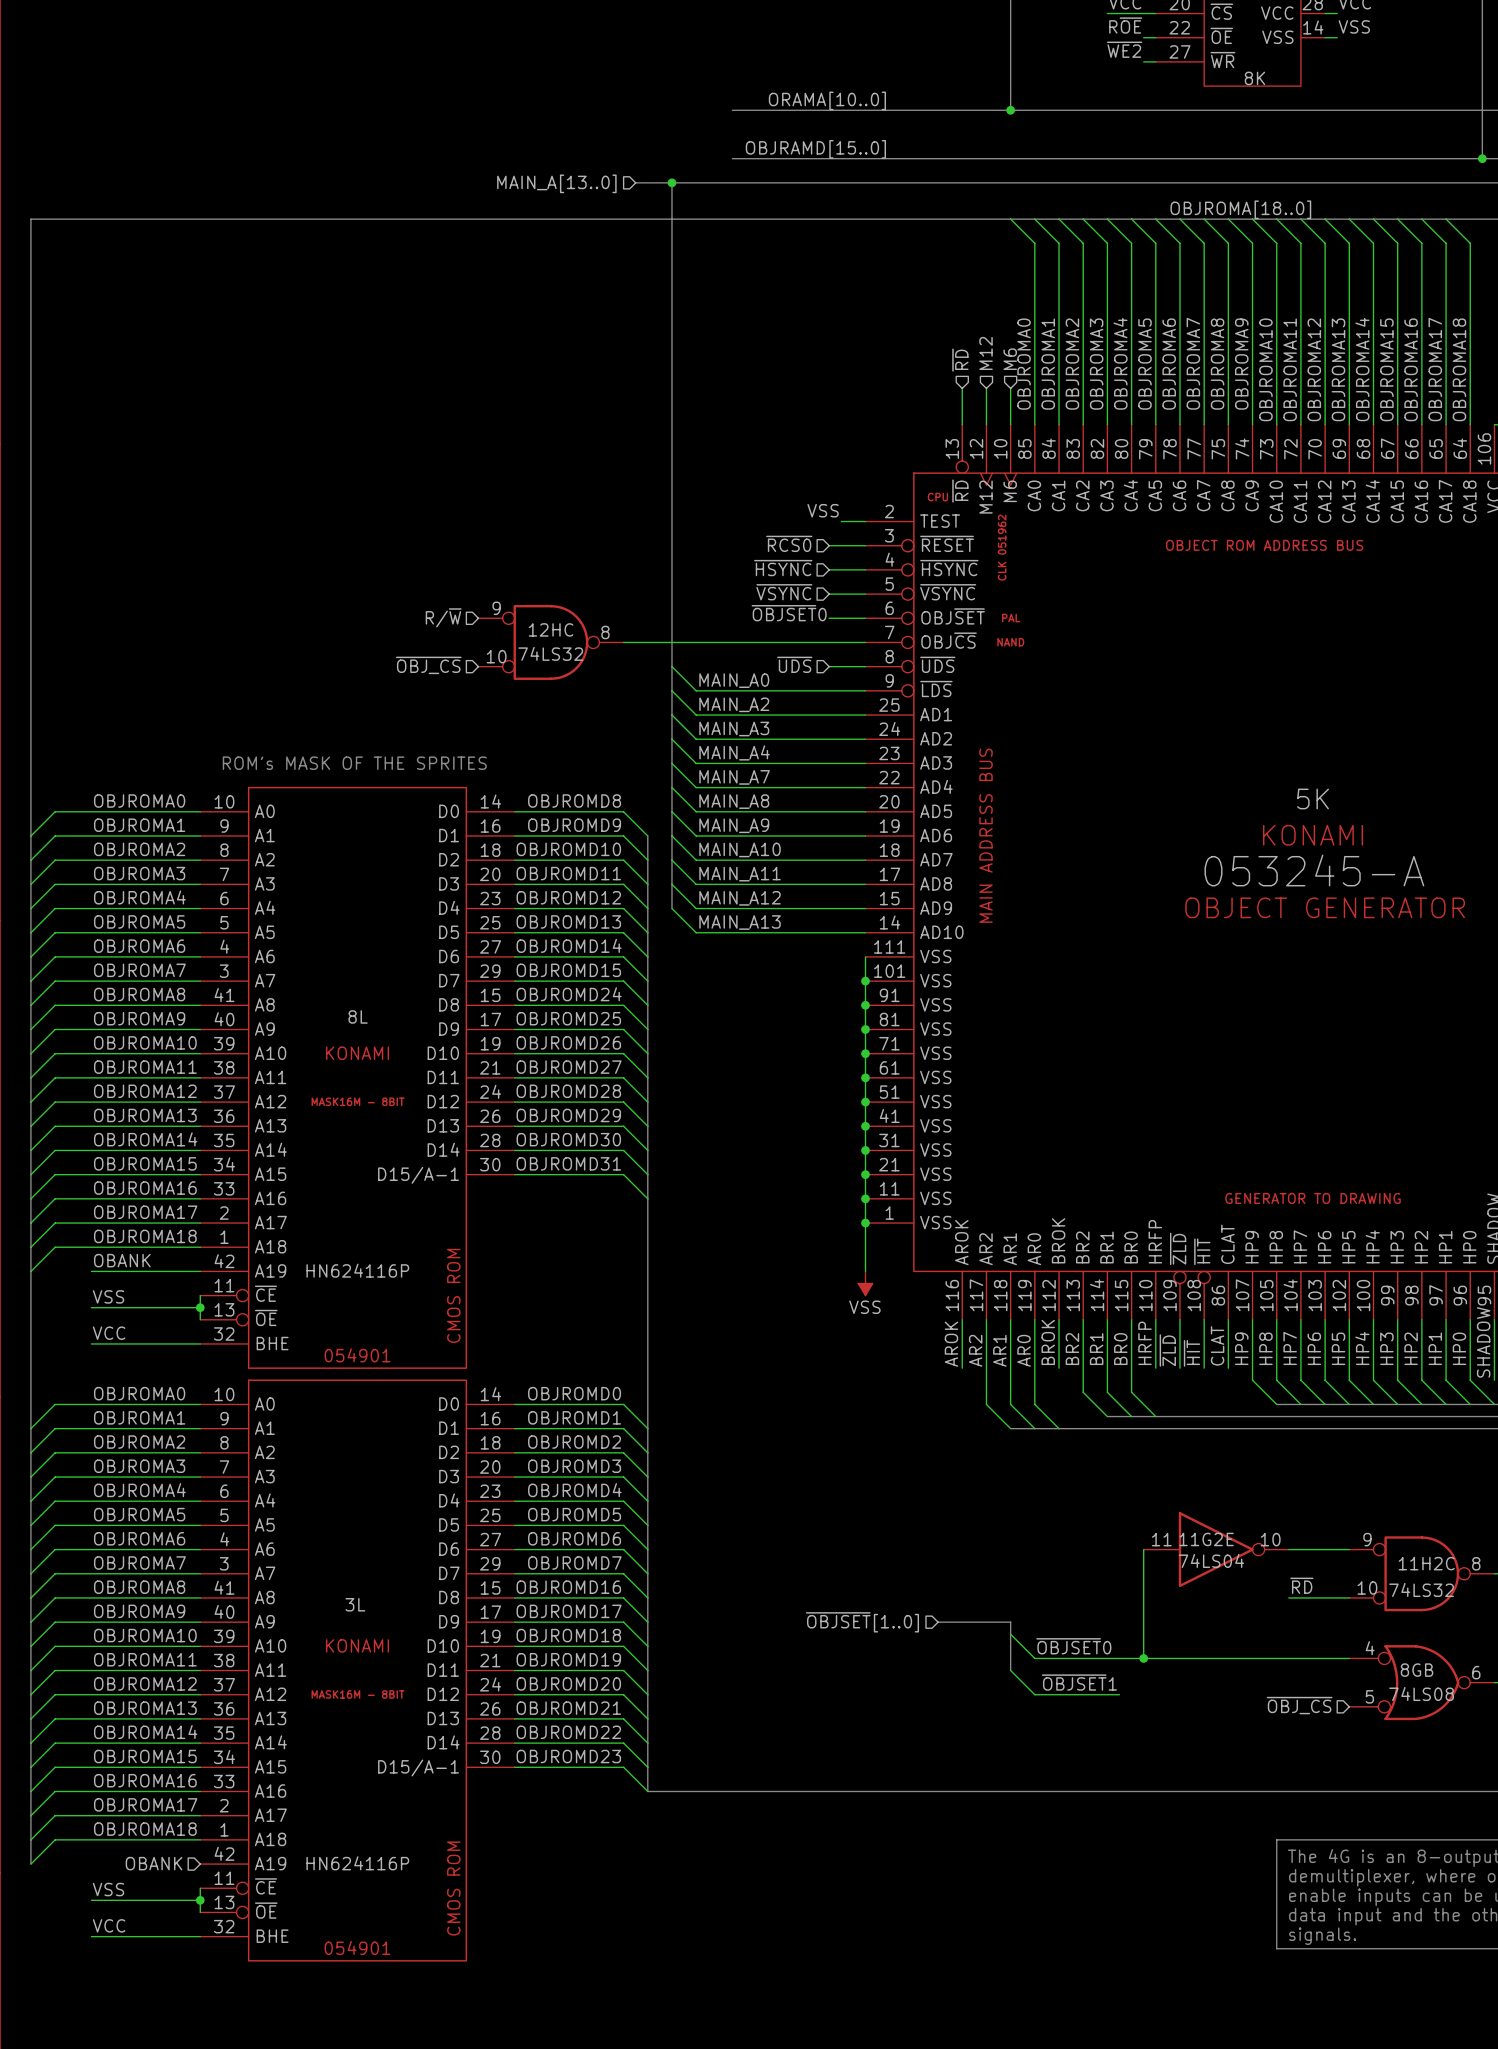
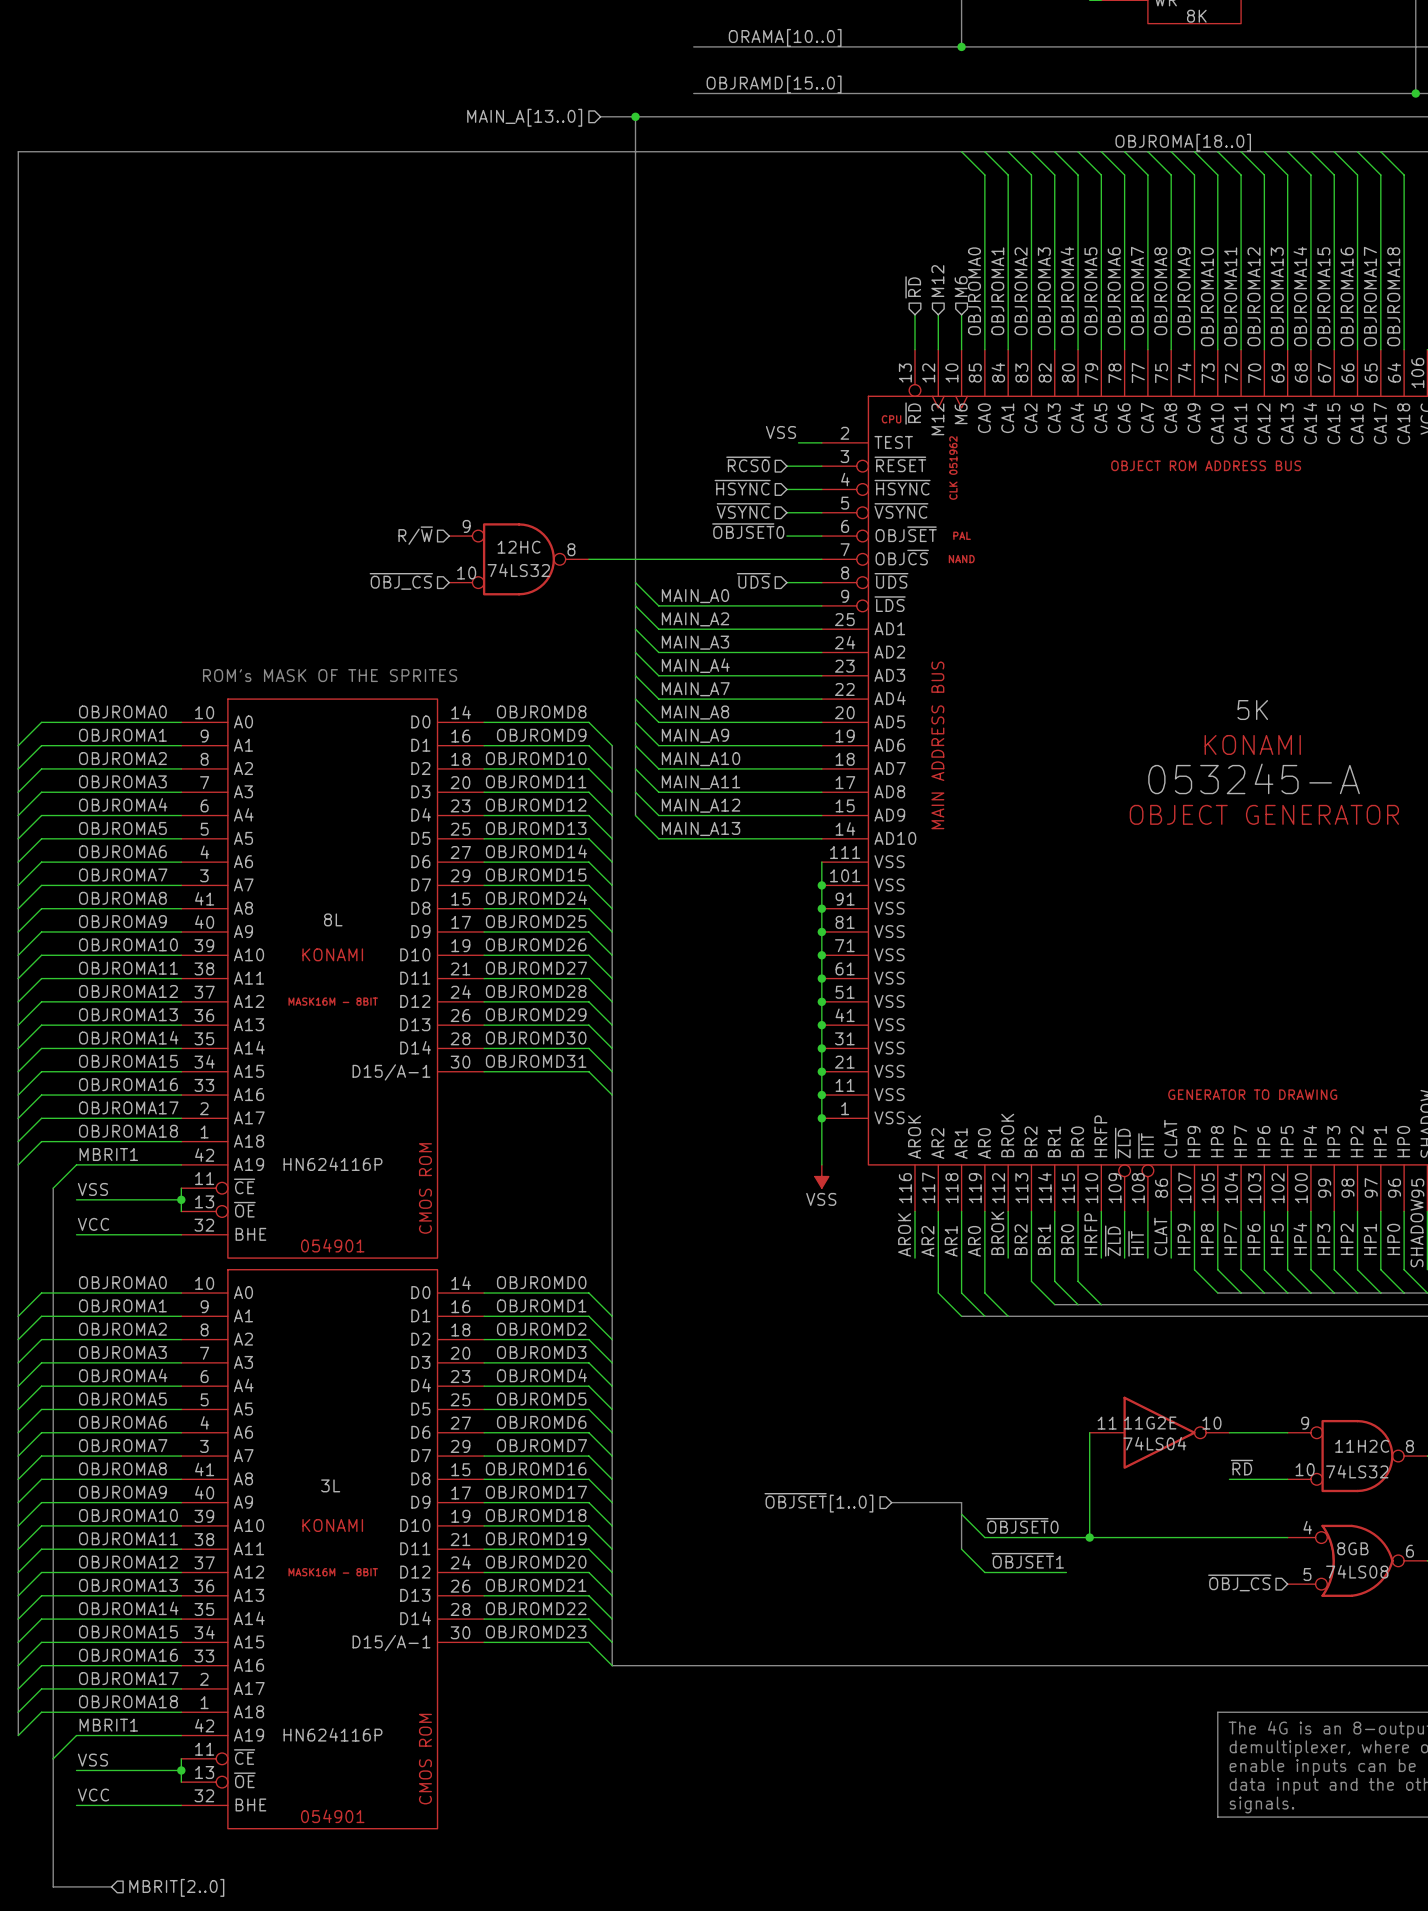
label: OBANK (122, 1260) -> MBRIT1 (108, 1154)
wire: none -> (76, 1164) (53, 1188)
bus: none -> (53, 1188) (53, 1886) (111, 1886)
label: none -> MBRIT1 (108, 1725)
hierarchical label: OBANK (154, 1863) -> none
wire: none -> (181, 1735) (76, 1735) (53, 1758)
hierarchical label: none -> MBRIT[2..0] (176, 1887)

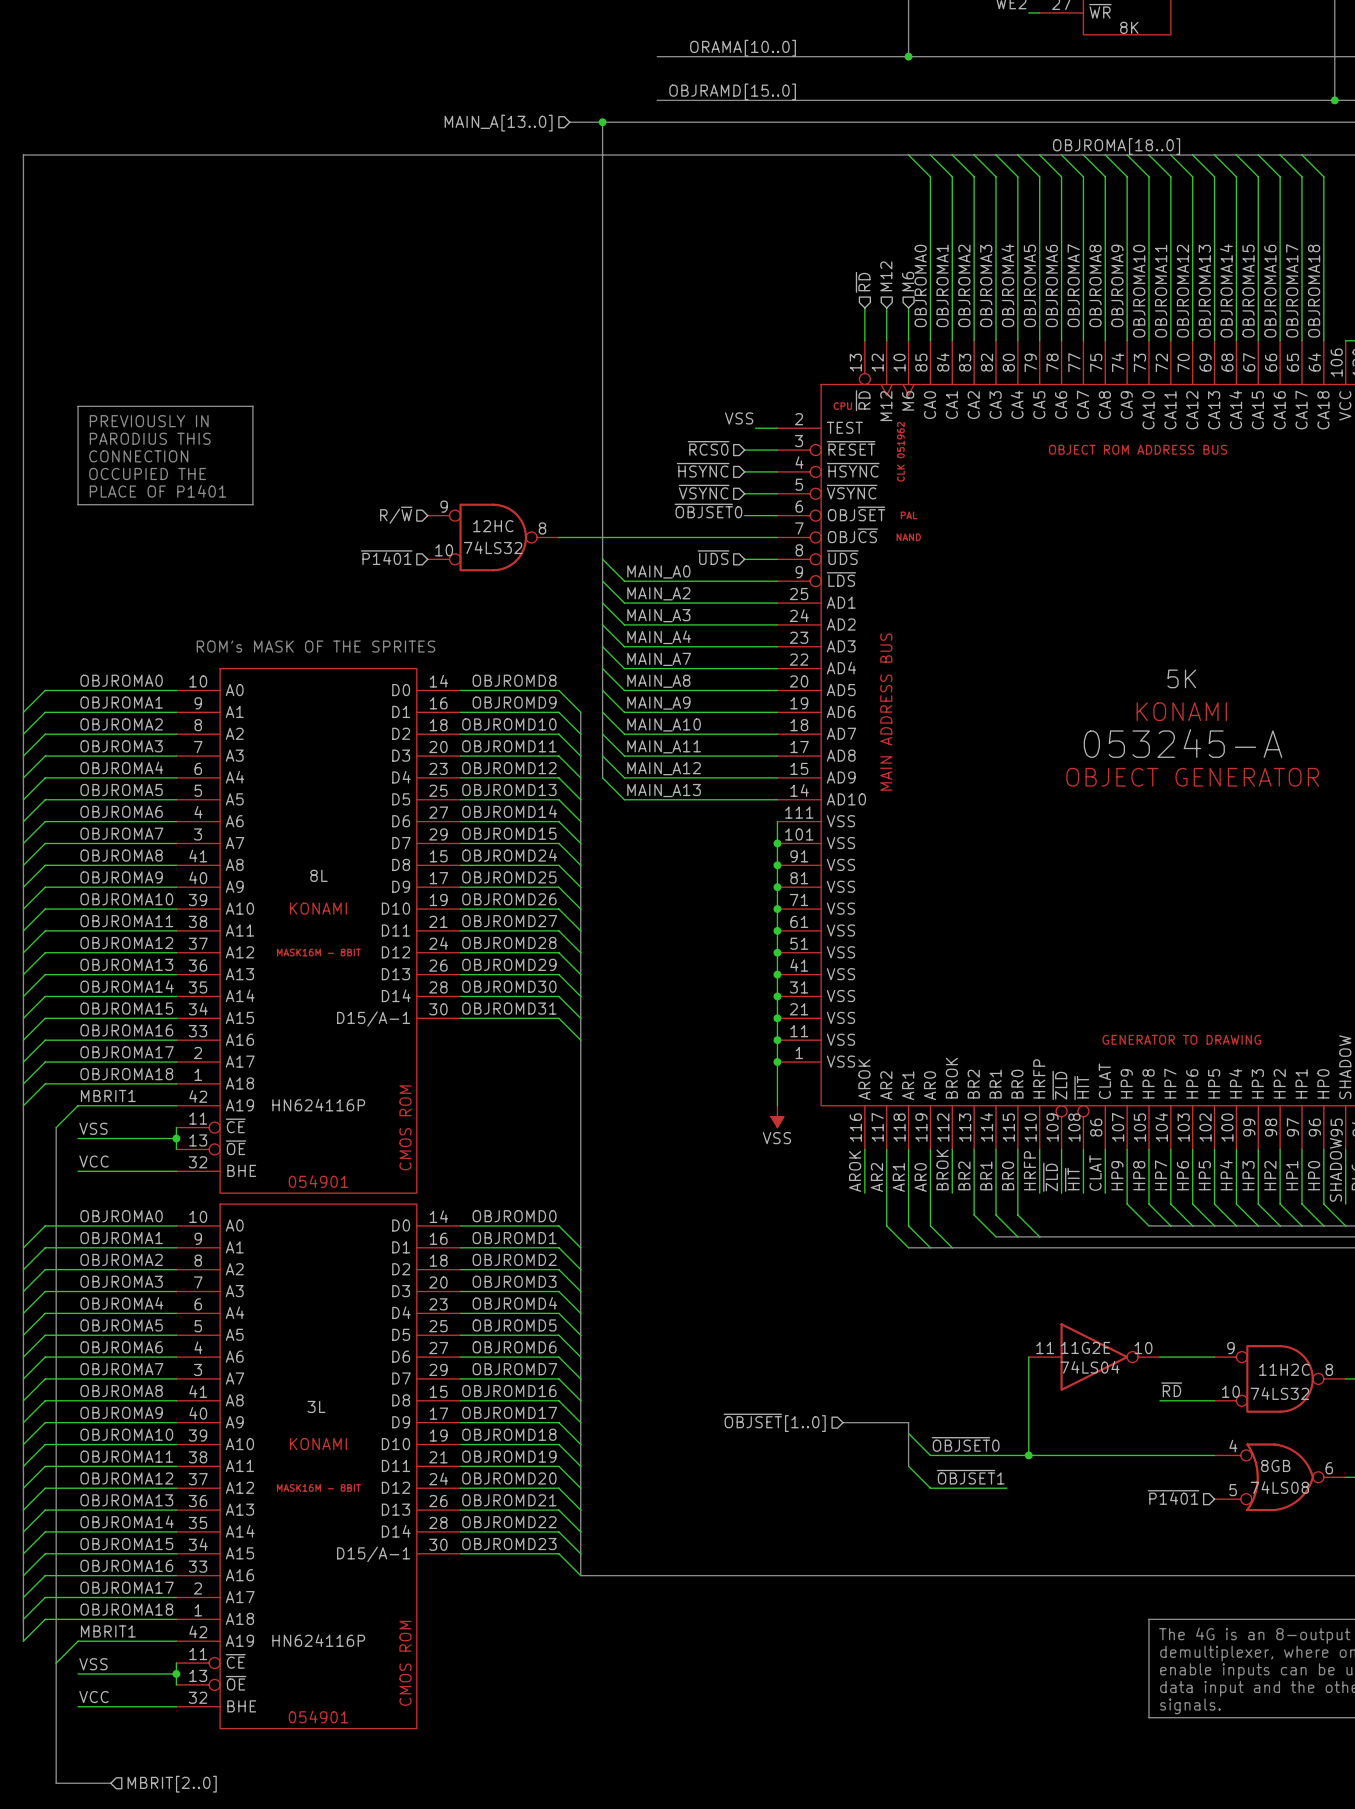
line: none -> (78, 406) (252, 406) (252, 504) (78, 504) (78, 406)
text: none -> PREVIOUSLY IN (149, 421)
text: none -> PARODIUS THIS (150, 438)
text: none -> CONNECTION (138, 456)
text: none -> OCCUPIED THE (147, 473)
text: none -> PLACE OF P1401 (158, 491)
hierarchical label: ~{OBJ_CS} (401, 581) -> ~{P1401} (386, 557)
hierarchical label: ~{OBJ_CS} (1239, 1582) -> ~{P1401} (1173, 1497)

